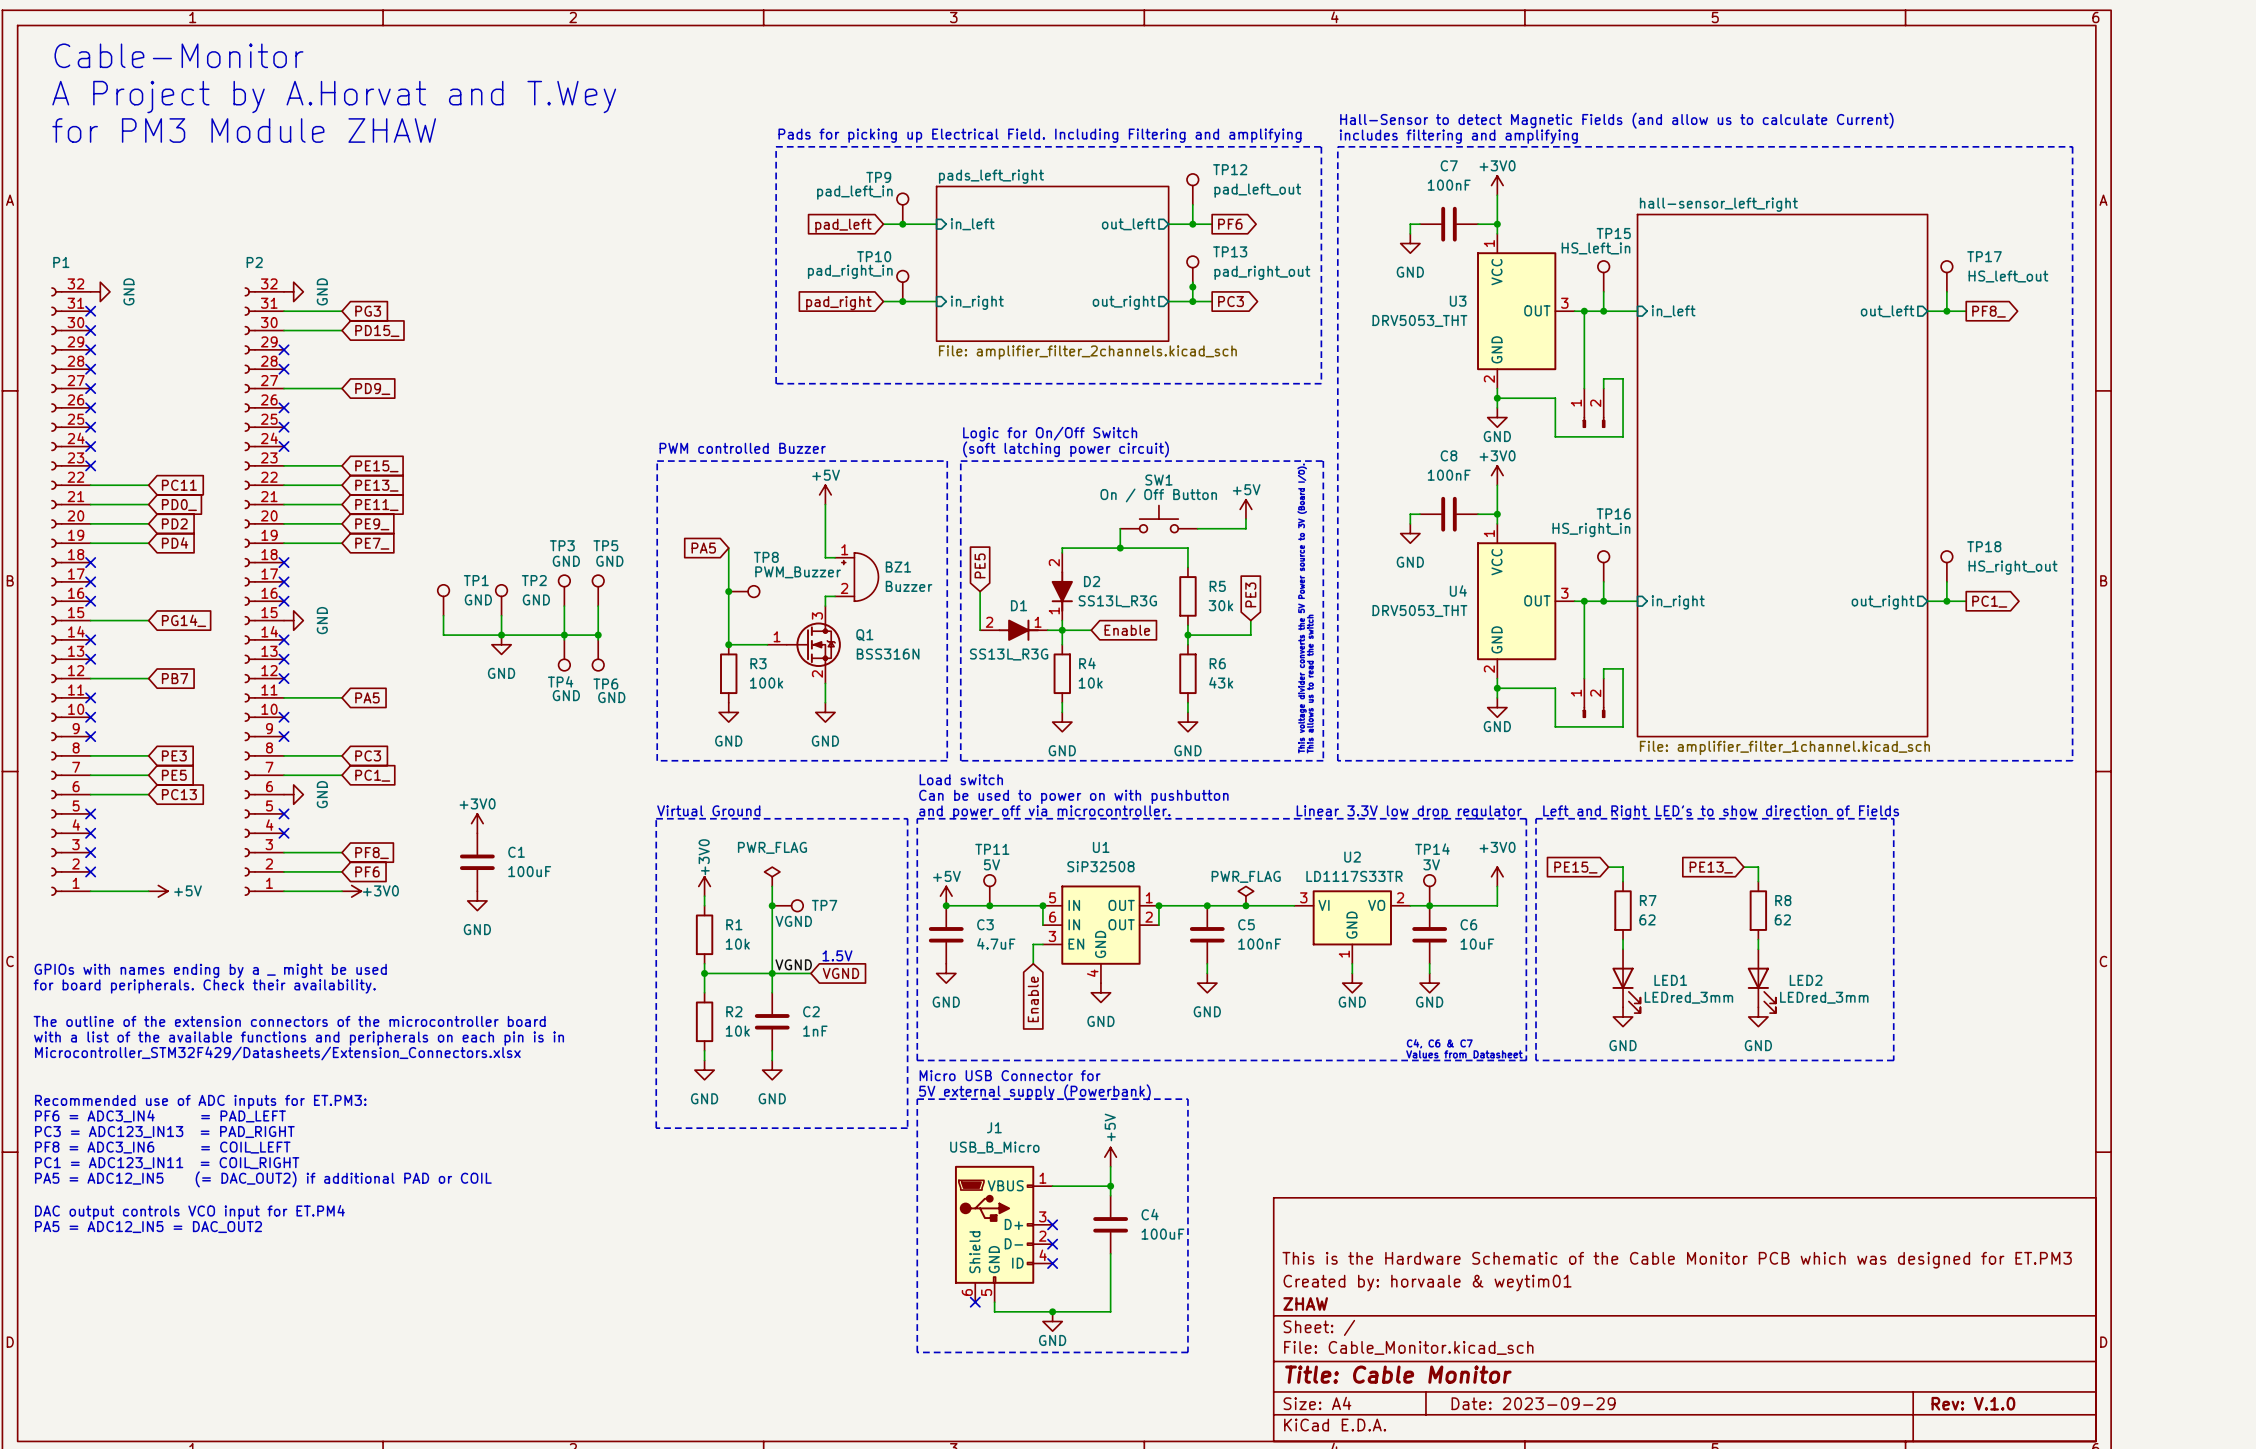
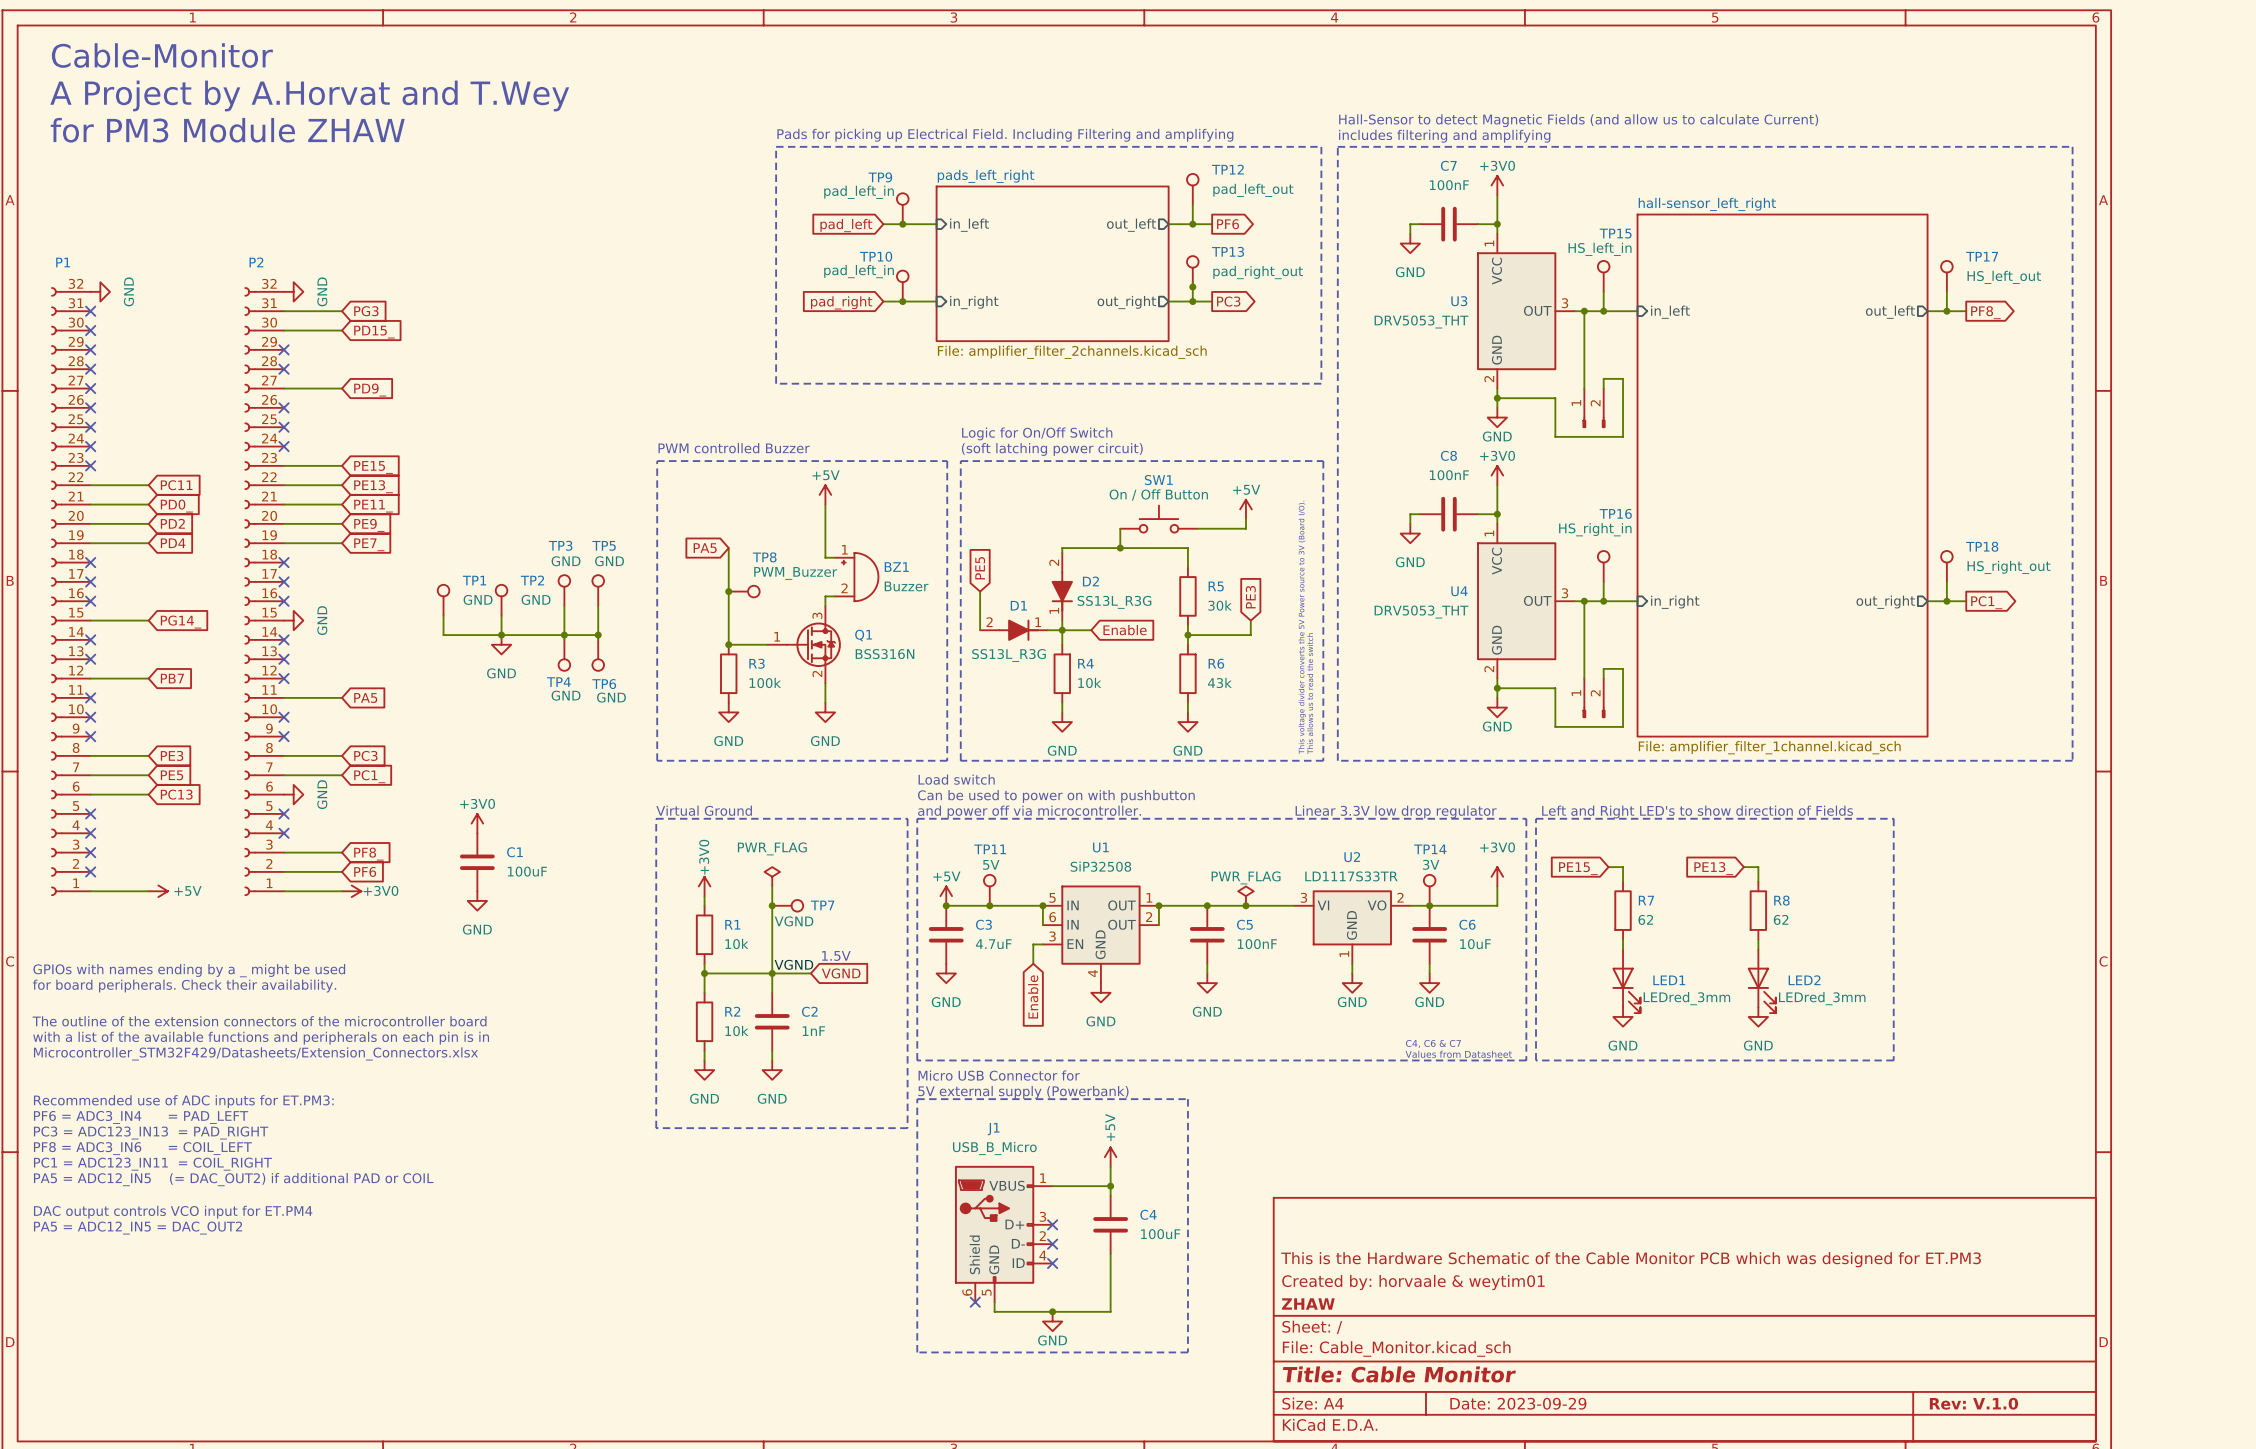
TP10 value: pad_right_in (850, 271) -> pad_left_in (859, 271)

